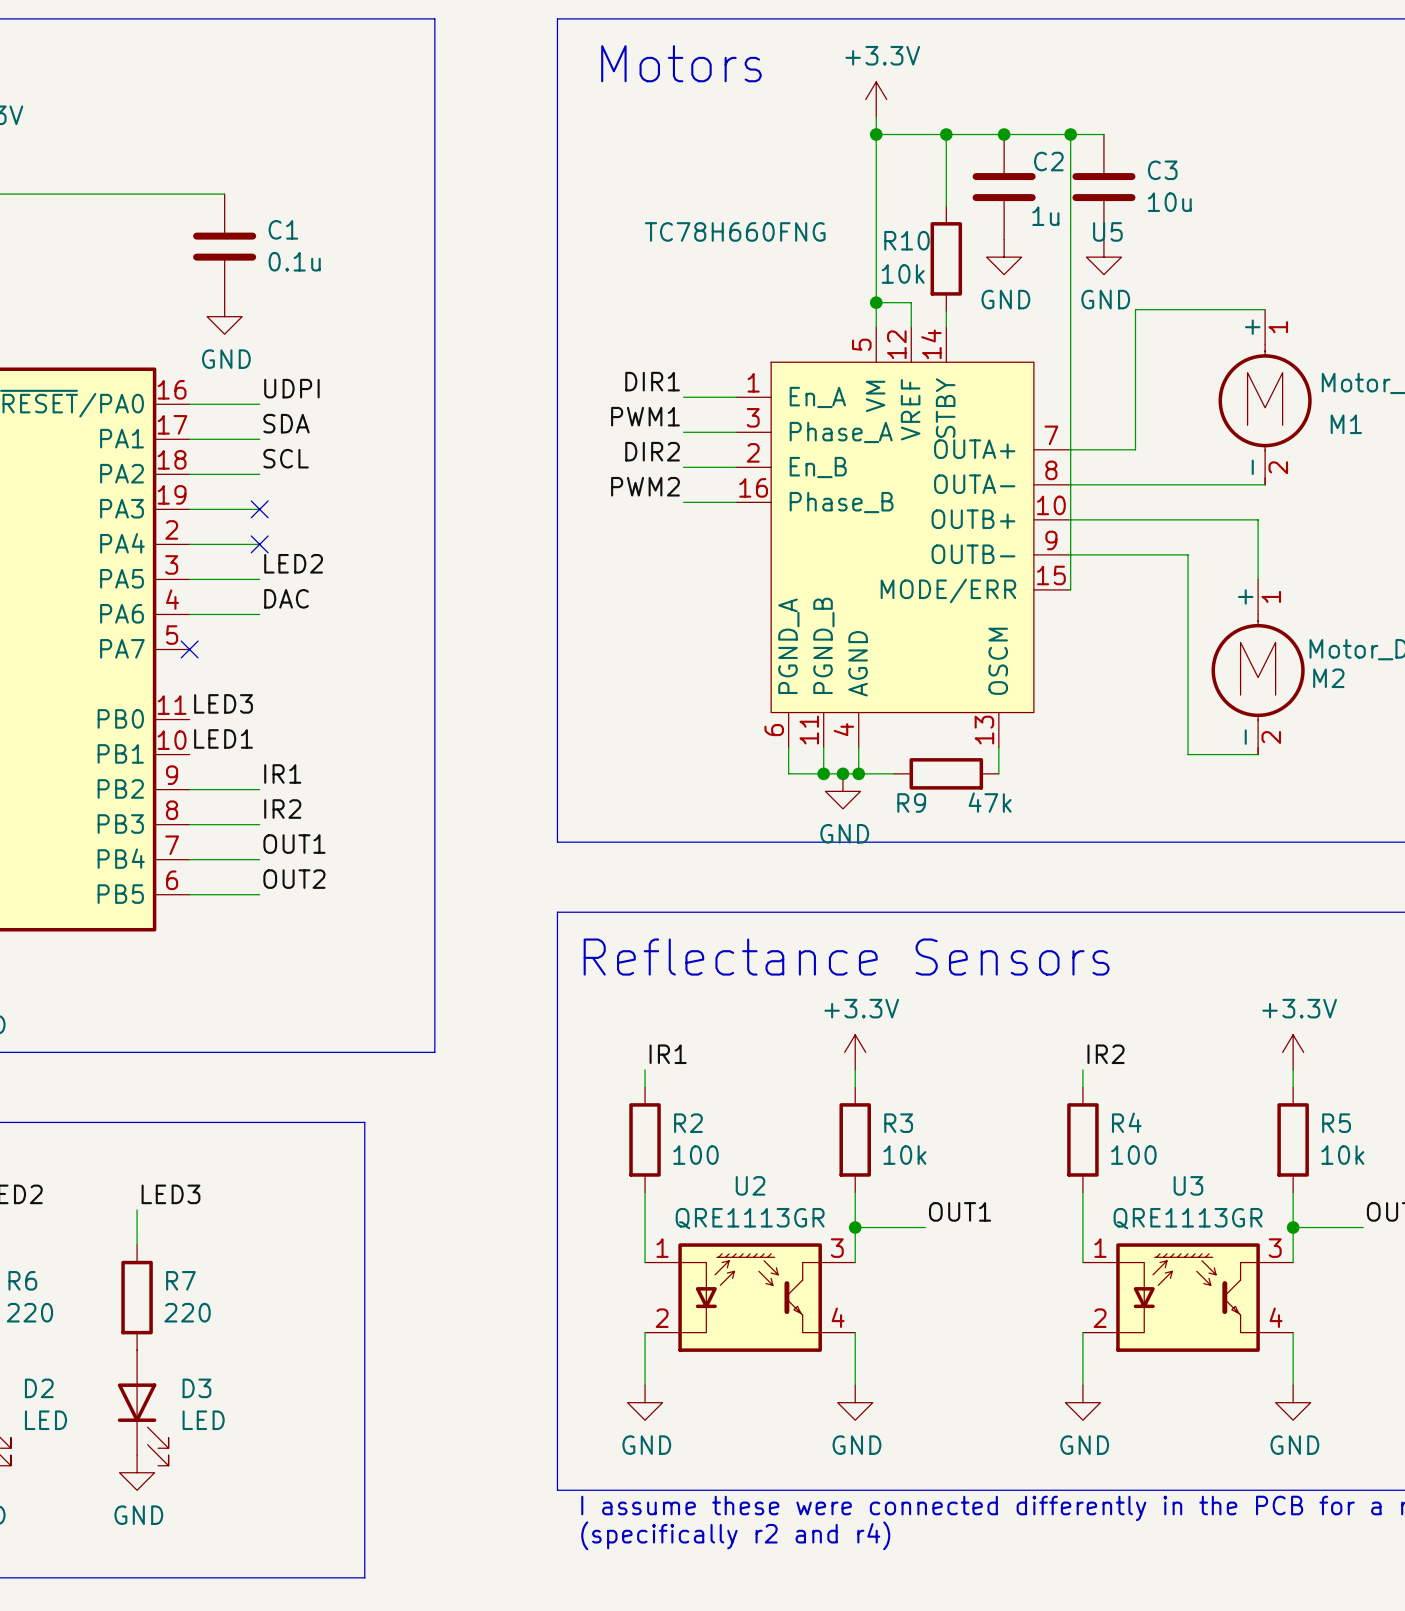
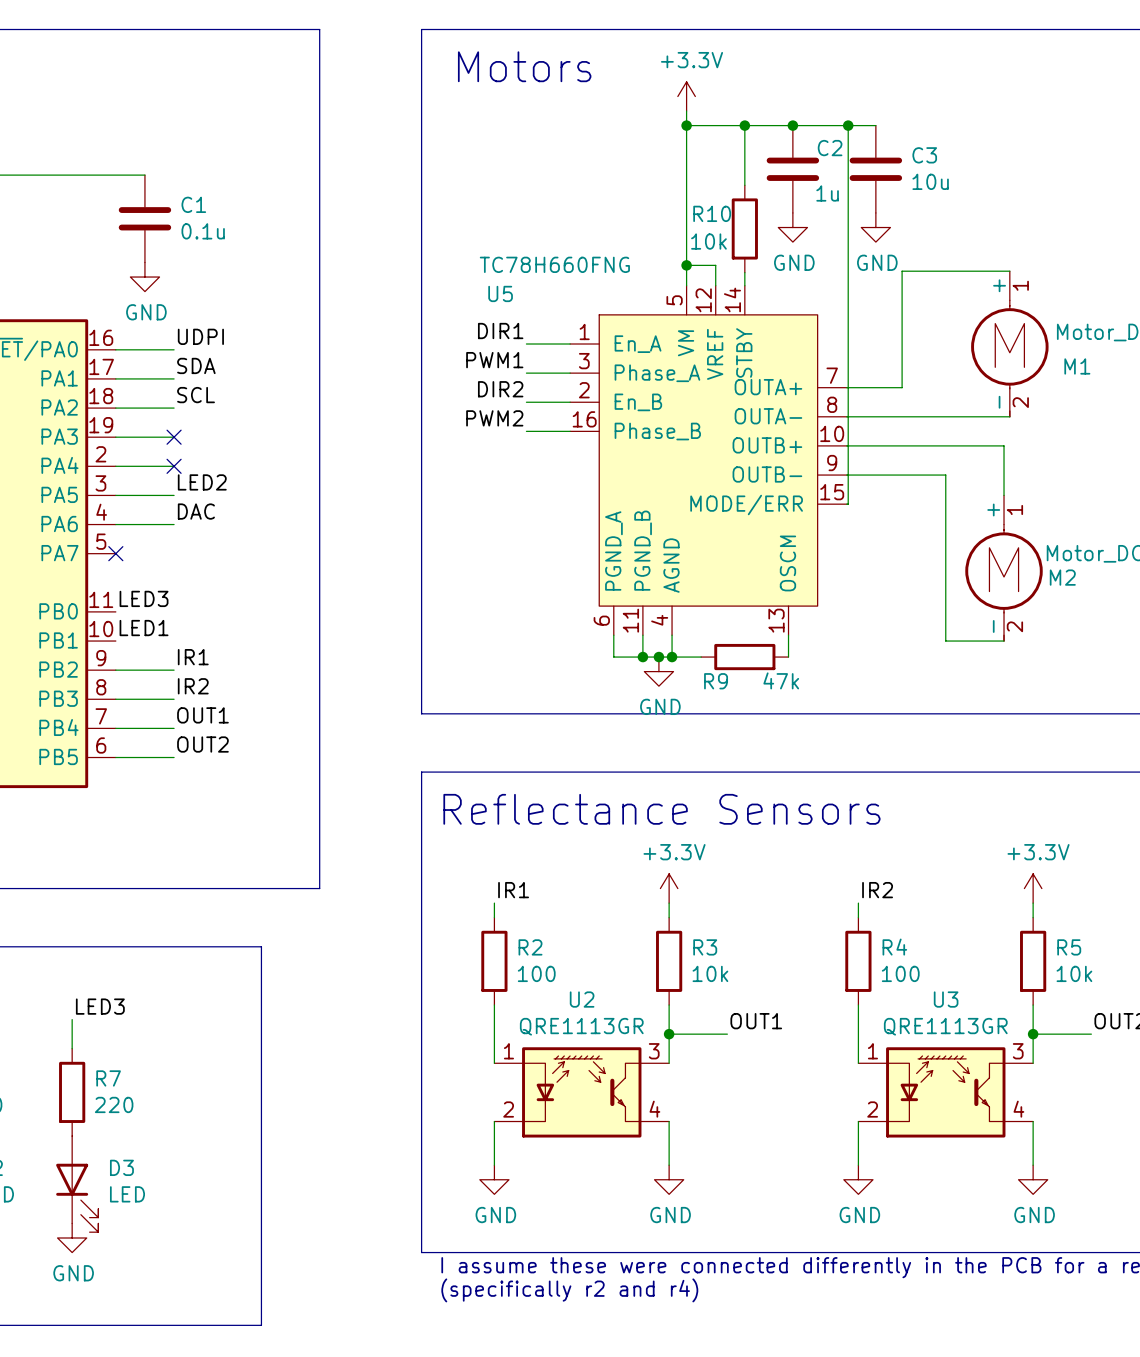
U5 value position: TC78H660FNG (735, 231) -> TC78H660FNG (554, 264)
U5 name position: U5 (1107, 231) -> U5 (500, 293)

